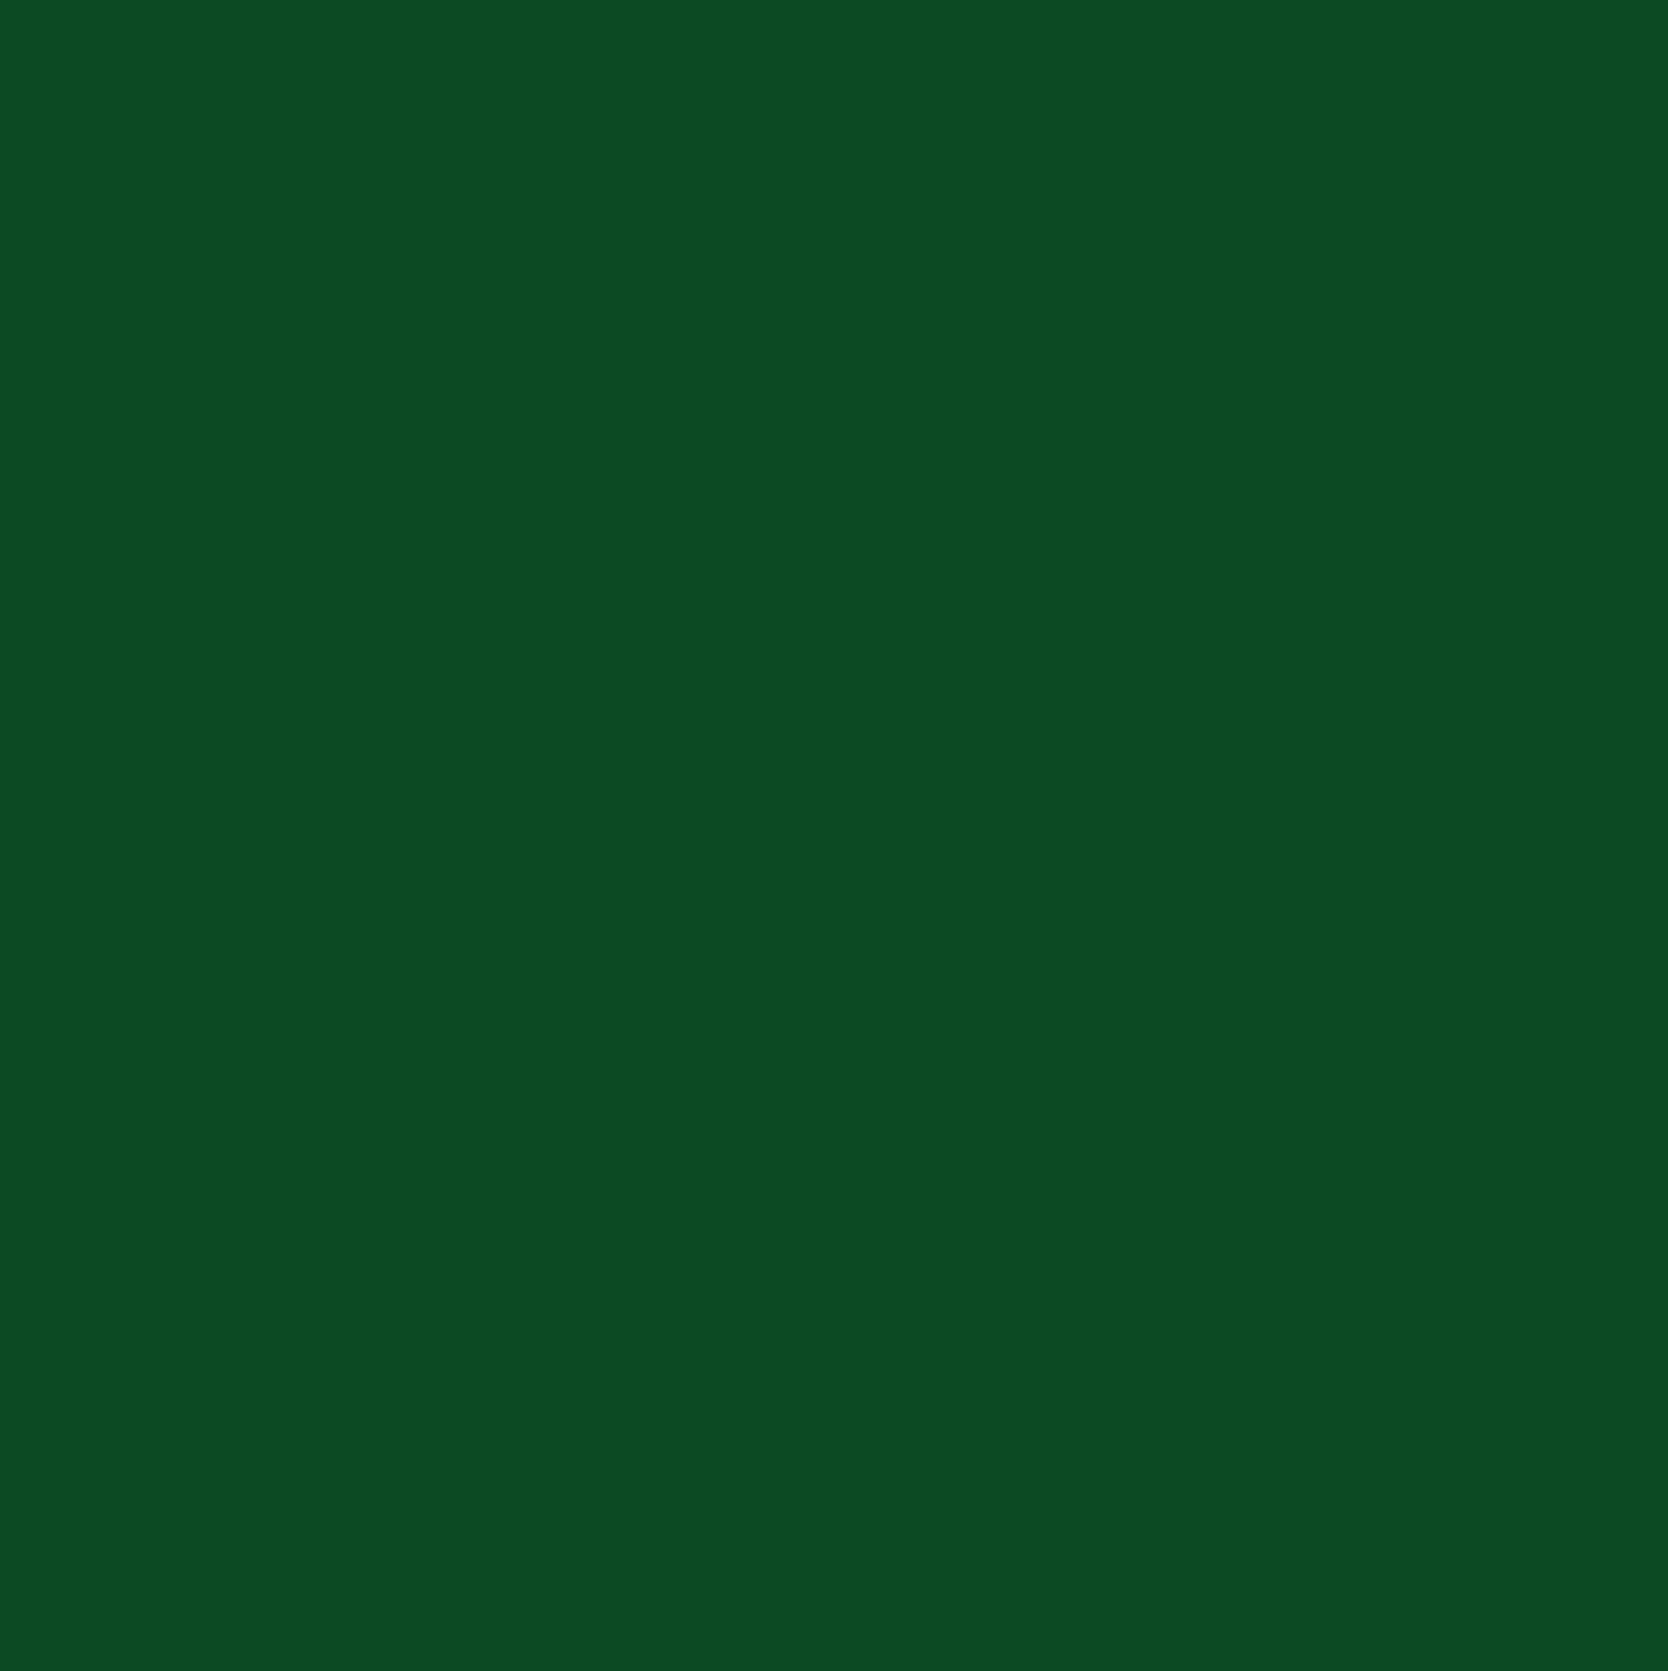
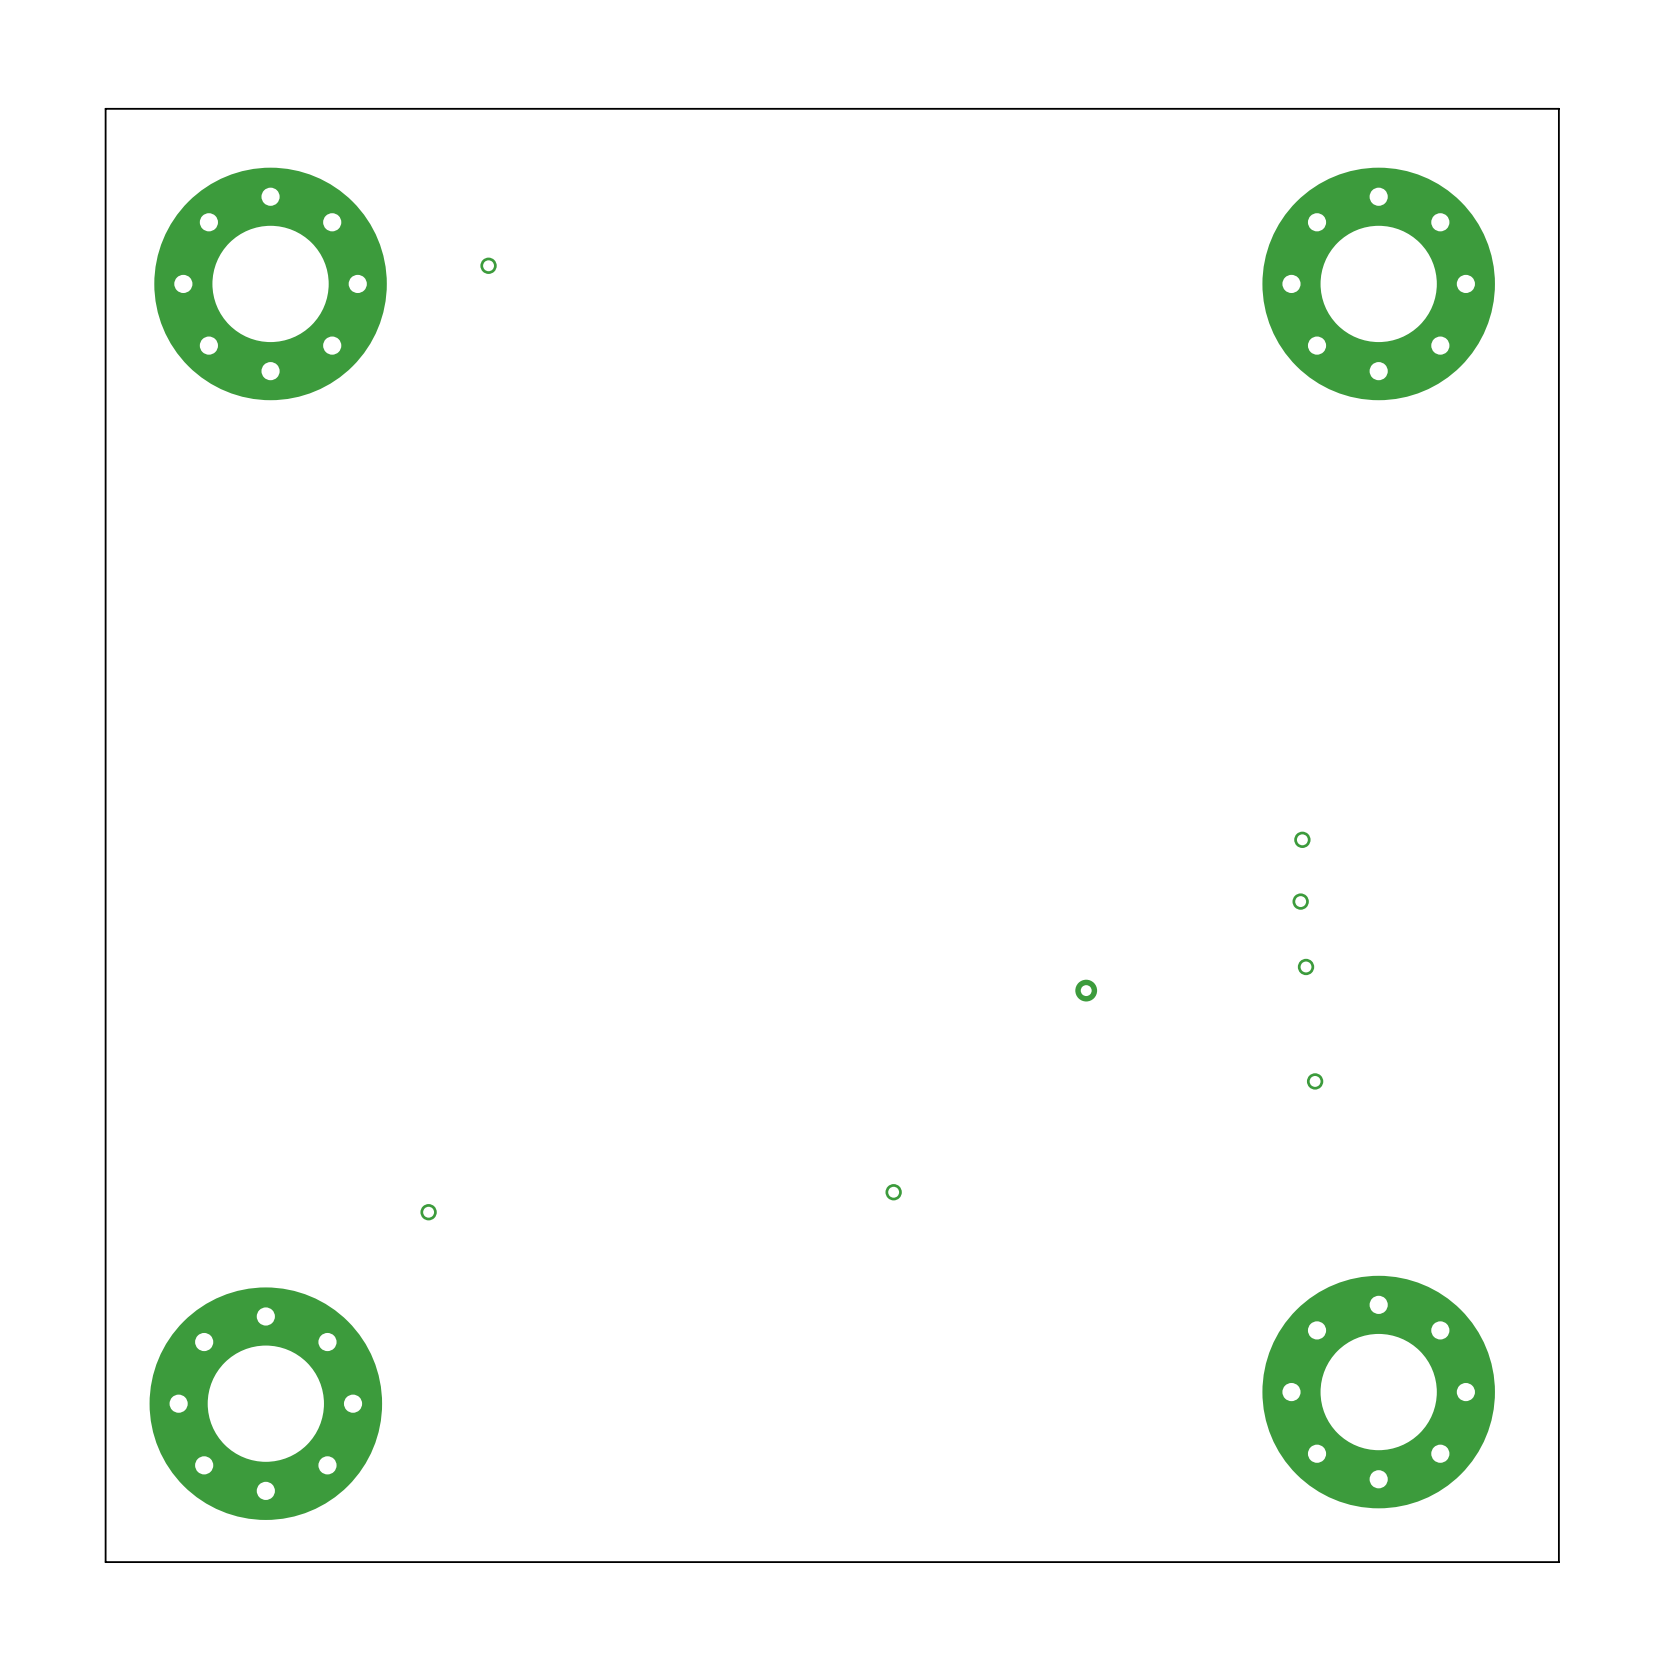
board edge: none -> (1558, 108) (105, 108) (105, 1562) (1558, 1562) (1558, 108)
via: none -> (488, 265)
part: none -> (270, 283)
part: none -> (1378, 283)
via: none -> (1302, 839)
via: none -> (1300, 901)
via: none -> (1306, 966)
via: none -> (1086, 990)
via: none -> (1315, 1081)
via: none -> (893, 1192)
via: none -> (428, 1212)
part: none -> (1378, 1392)
part: none -> (265, 1403)

